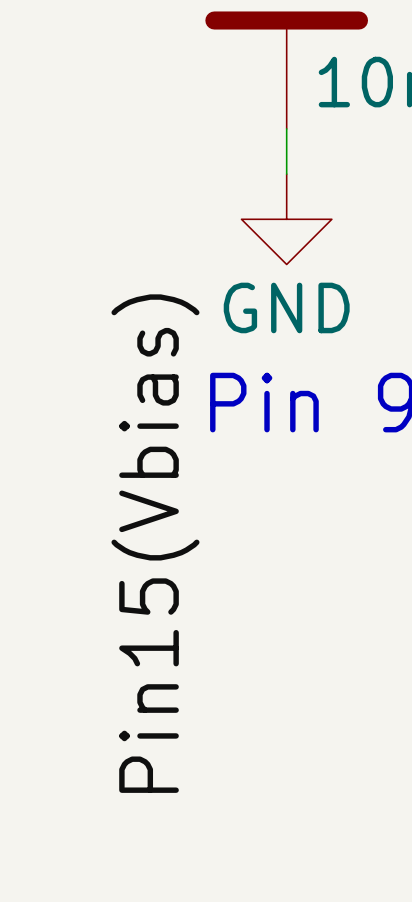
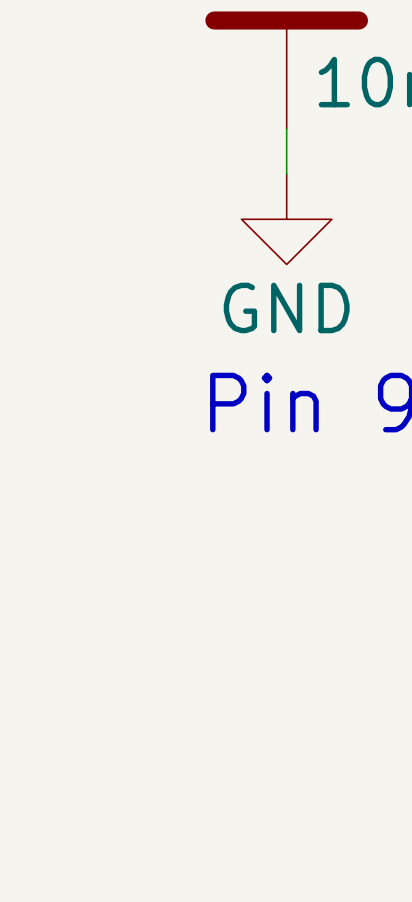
label: Pin15(Vbias) (155, 543) -> none

